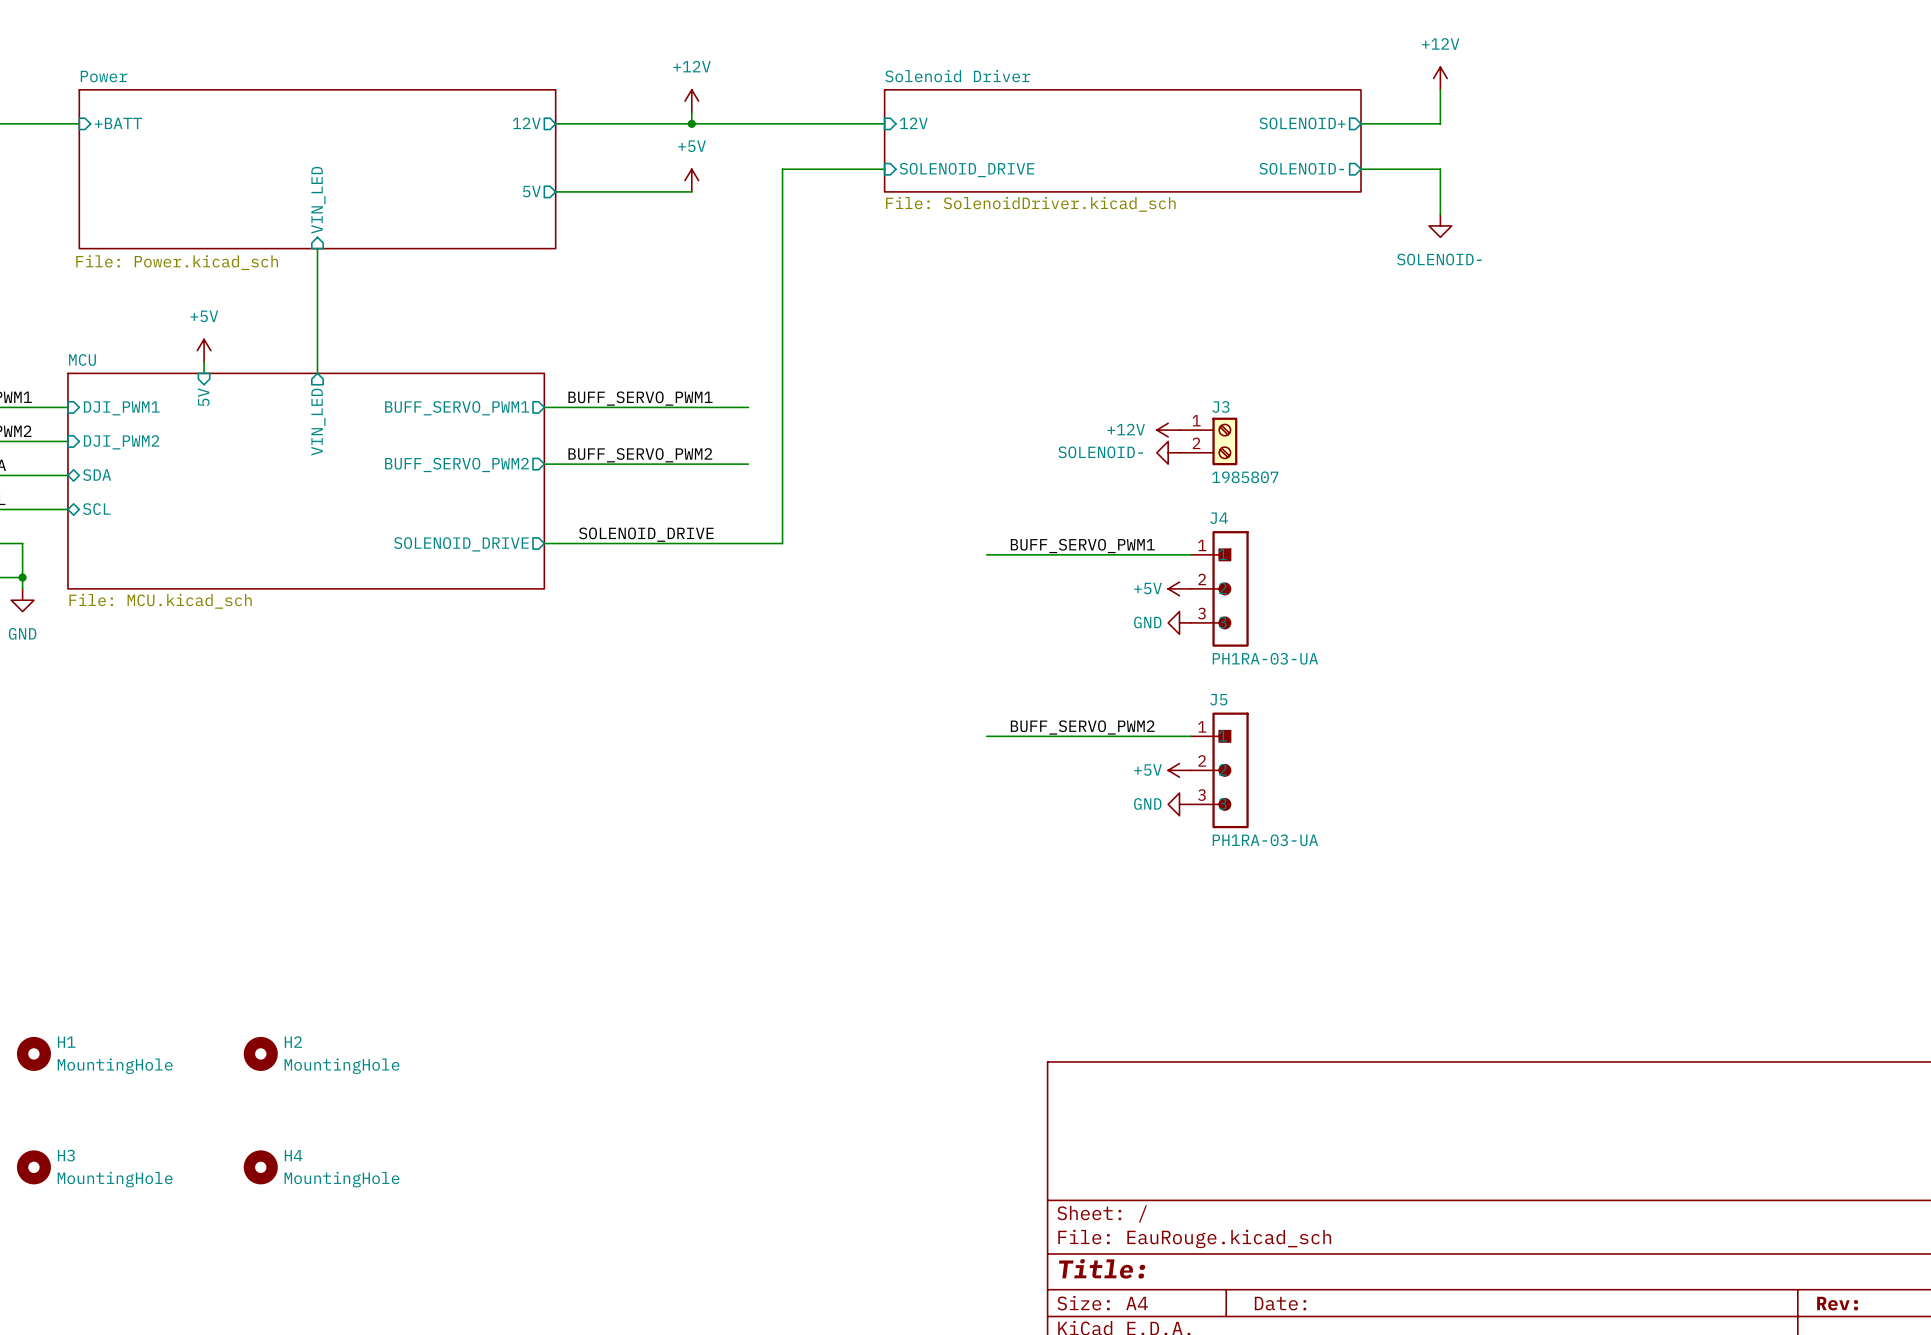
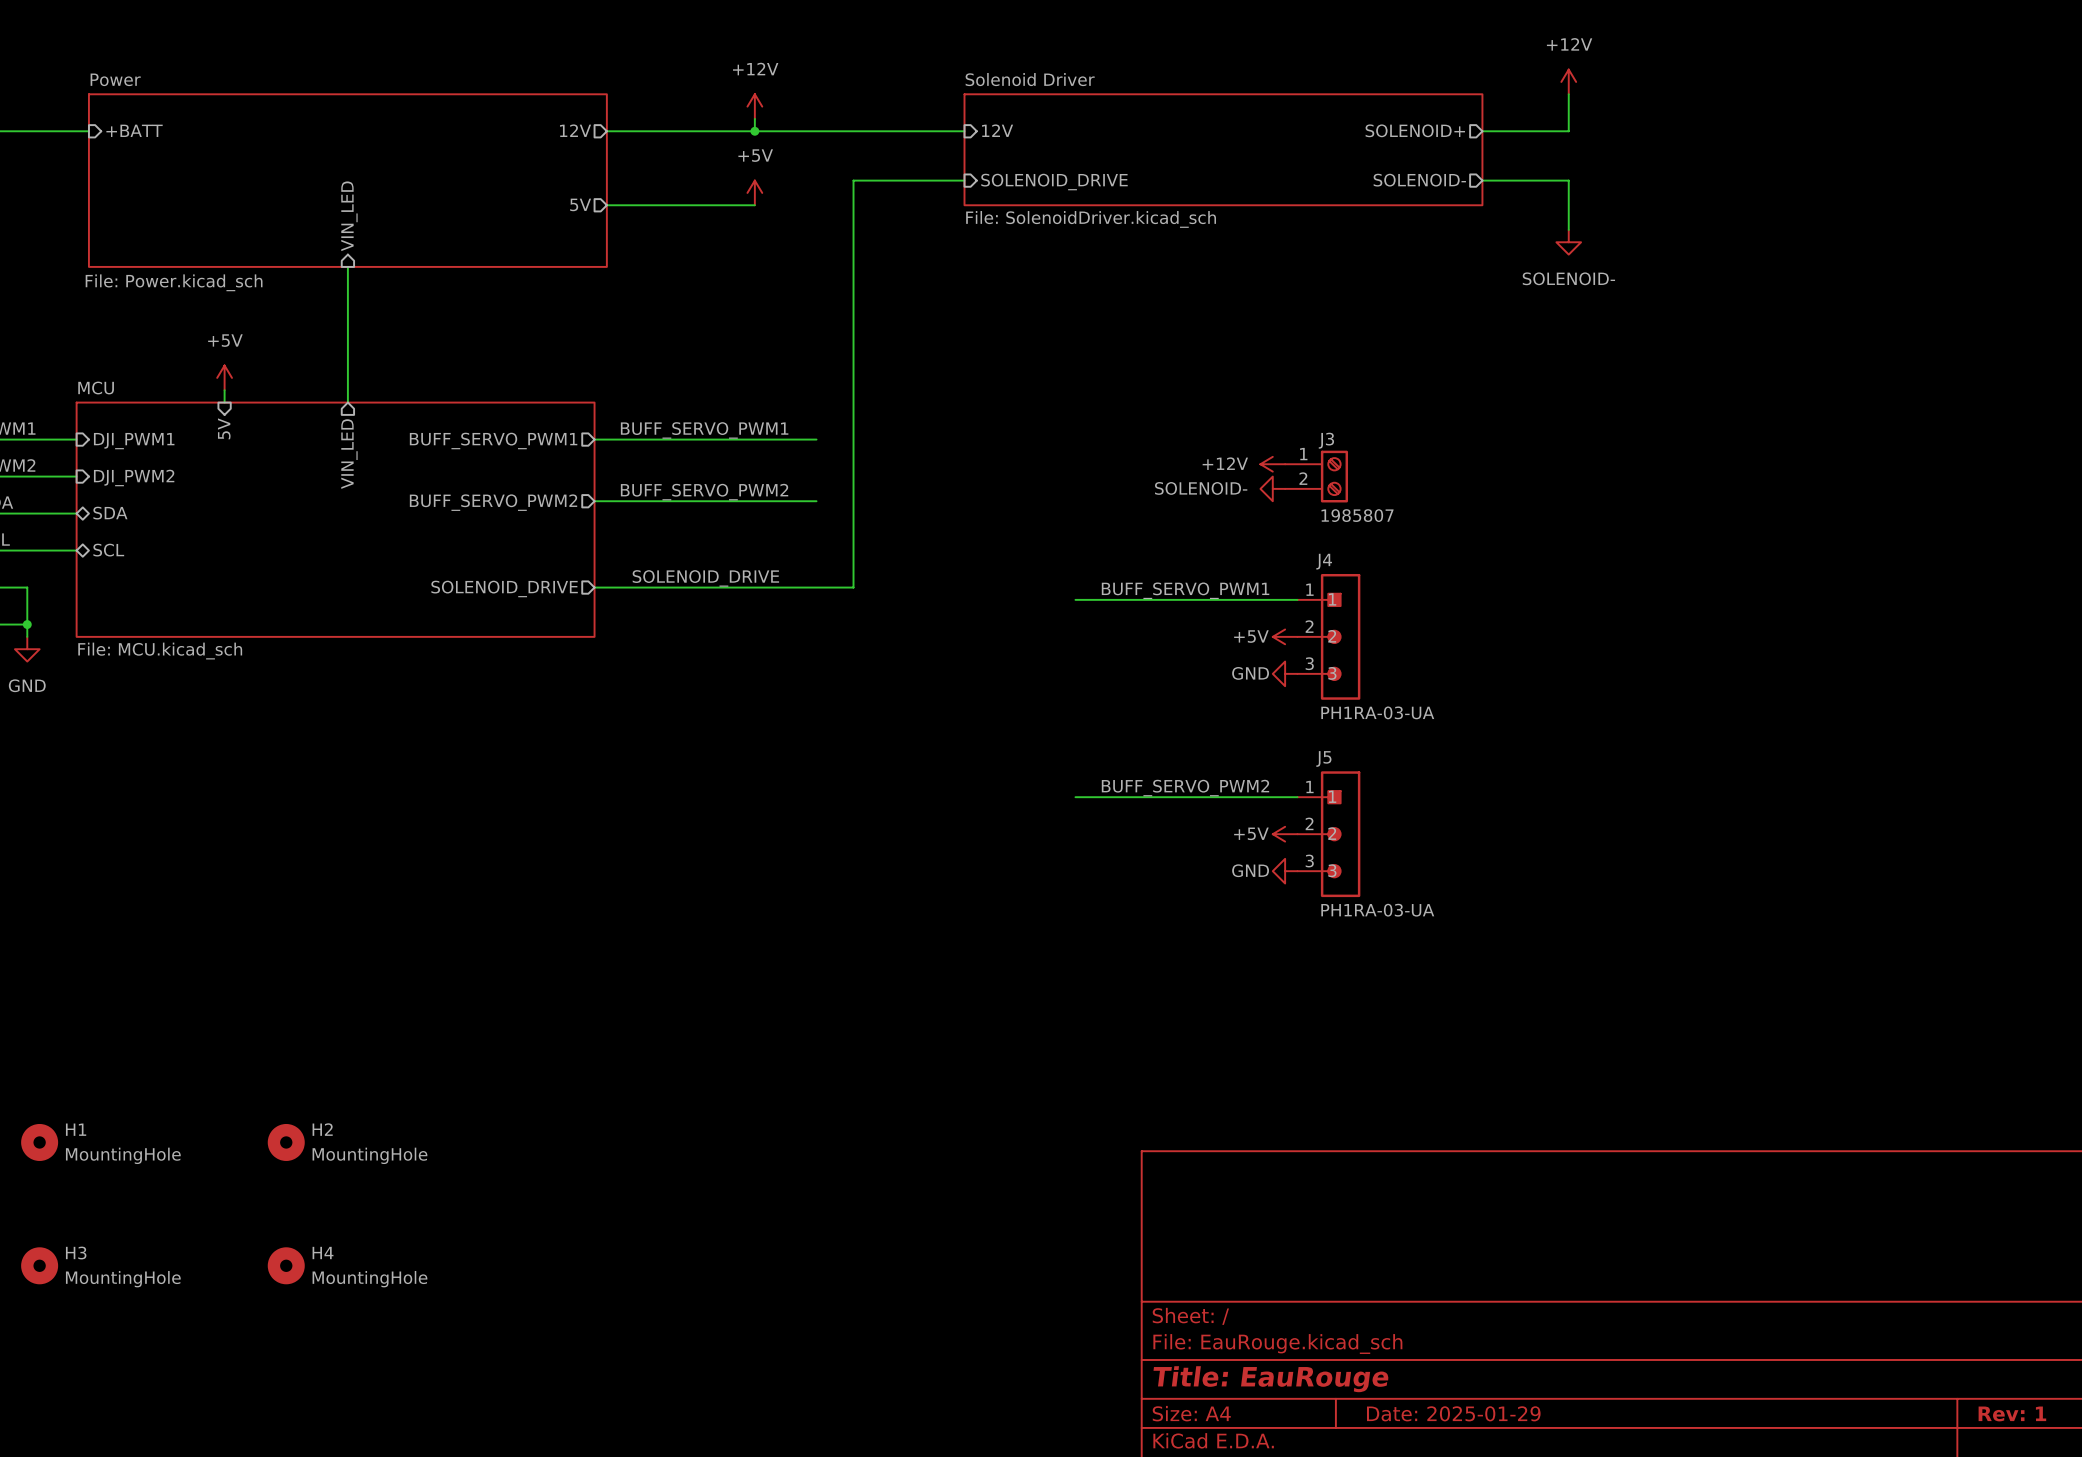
title block: Title: (1102, 1268) -> Title: EauRouge (1271, 1379)
title block: Date: (1280, 1303) -> Date: 2025-01-29 (1453, 1413)
title block: Rev: (1837, 1303) -> Rev: 1 (2012, 1413)

